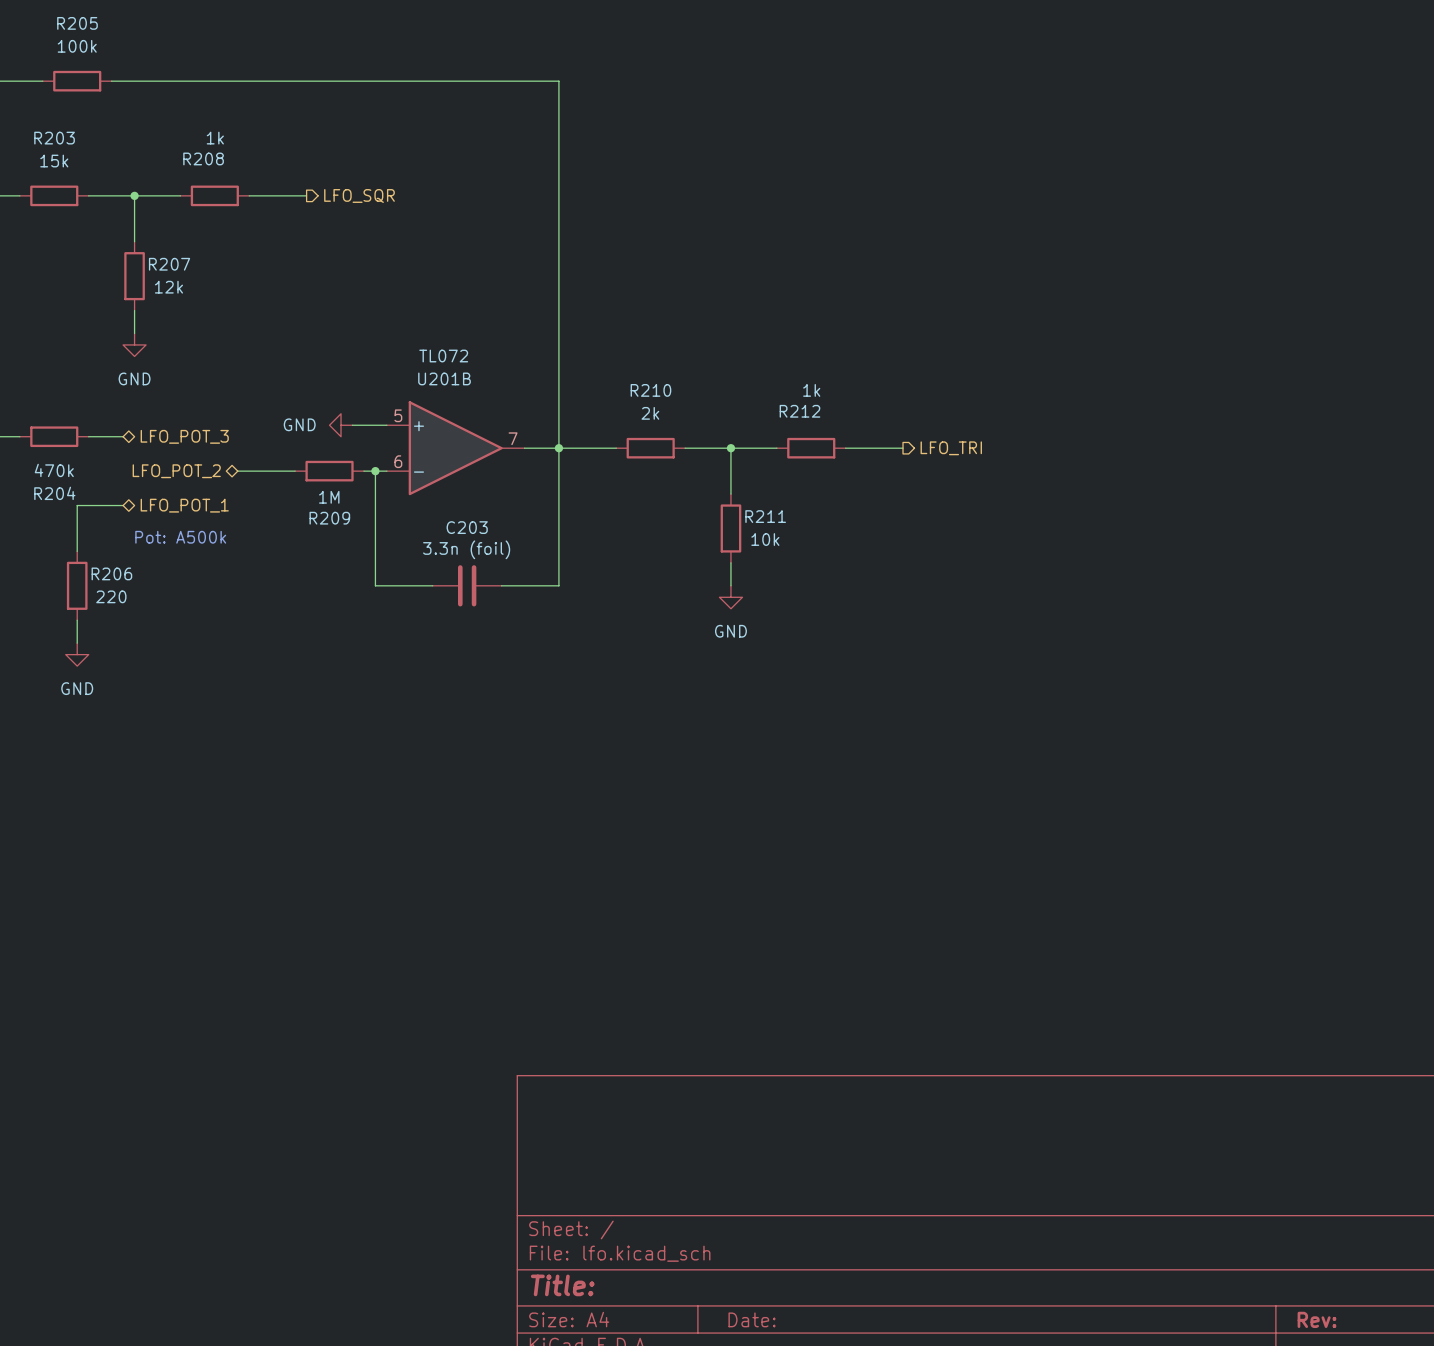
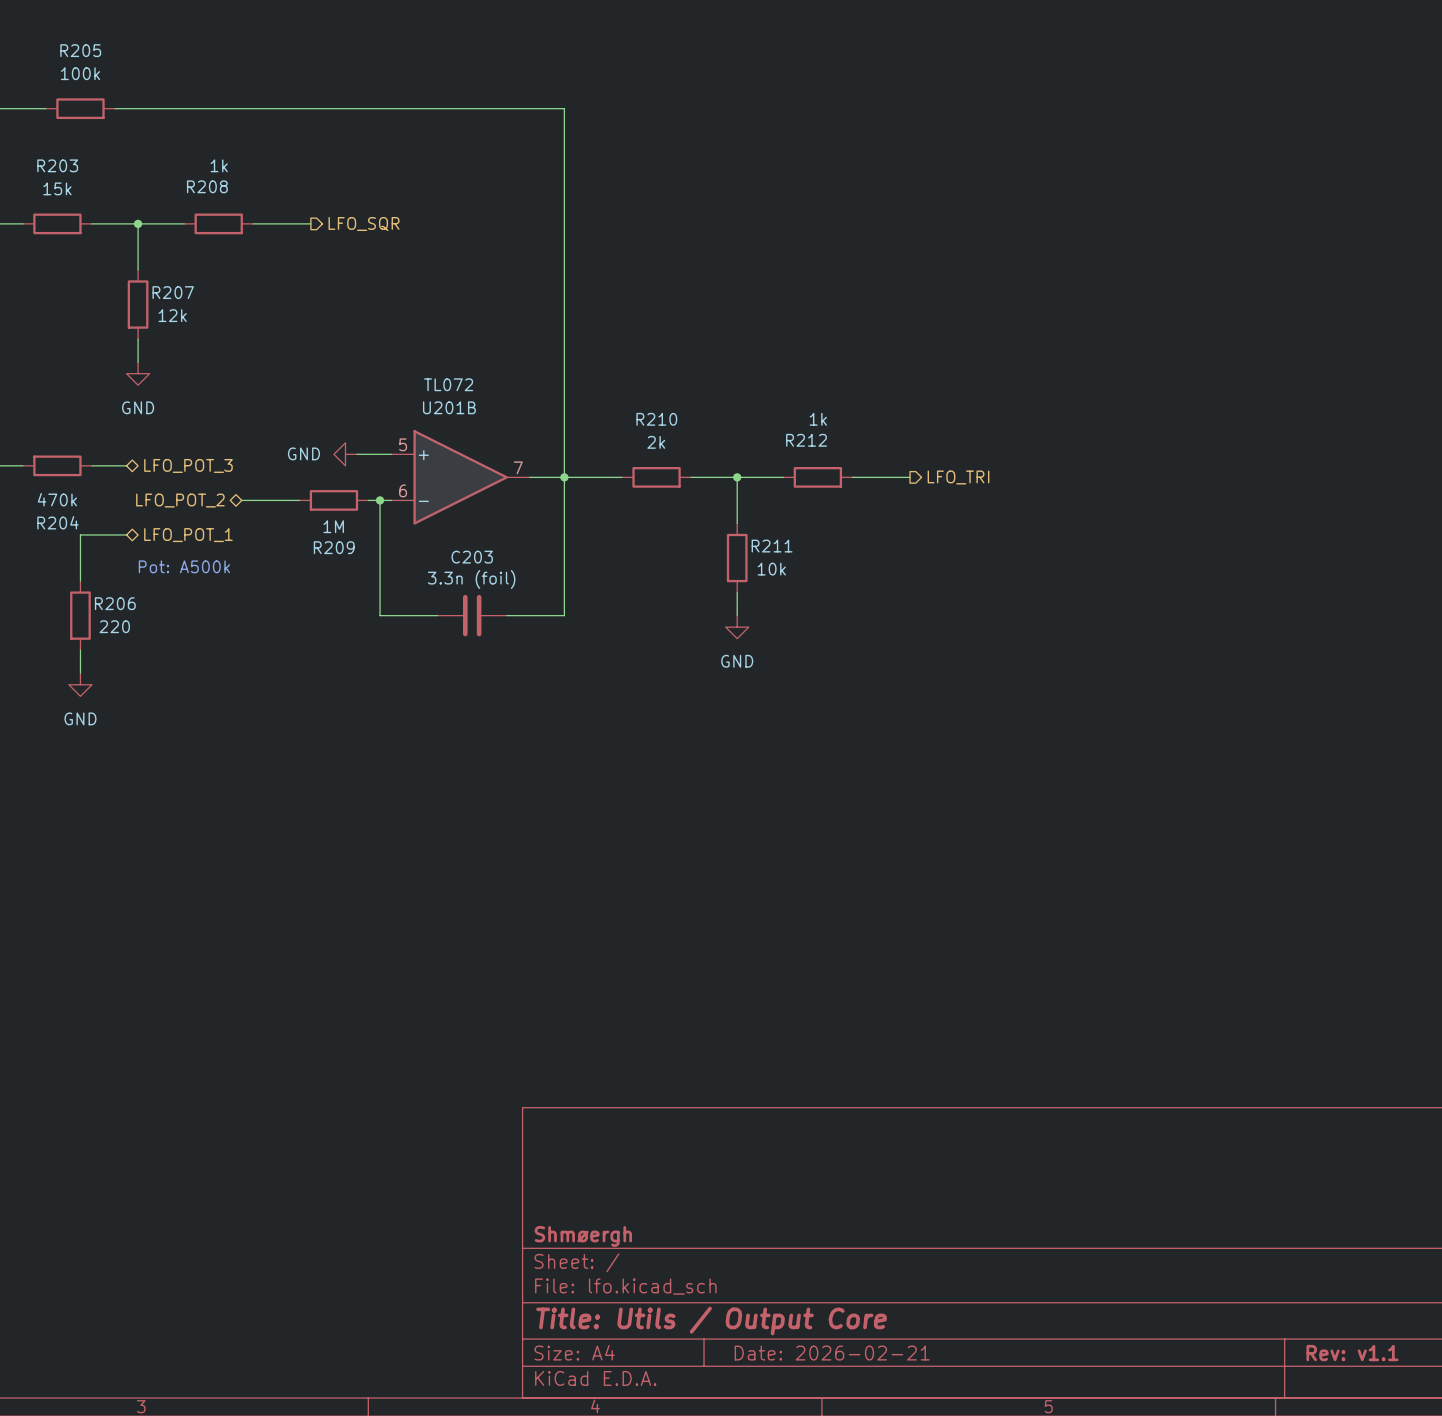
title block: none -> Shmøergh (583, 1236)
title block: Title: (562, 1285) -> Title: Utils / Output Core (711, 1321)
title block: Date: (752, 1319) -> Date: 2026-02-21 (832, 1353)
title block: Rev: (1317, 1319) -> Rev: v1.1 (1352, 1353)

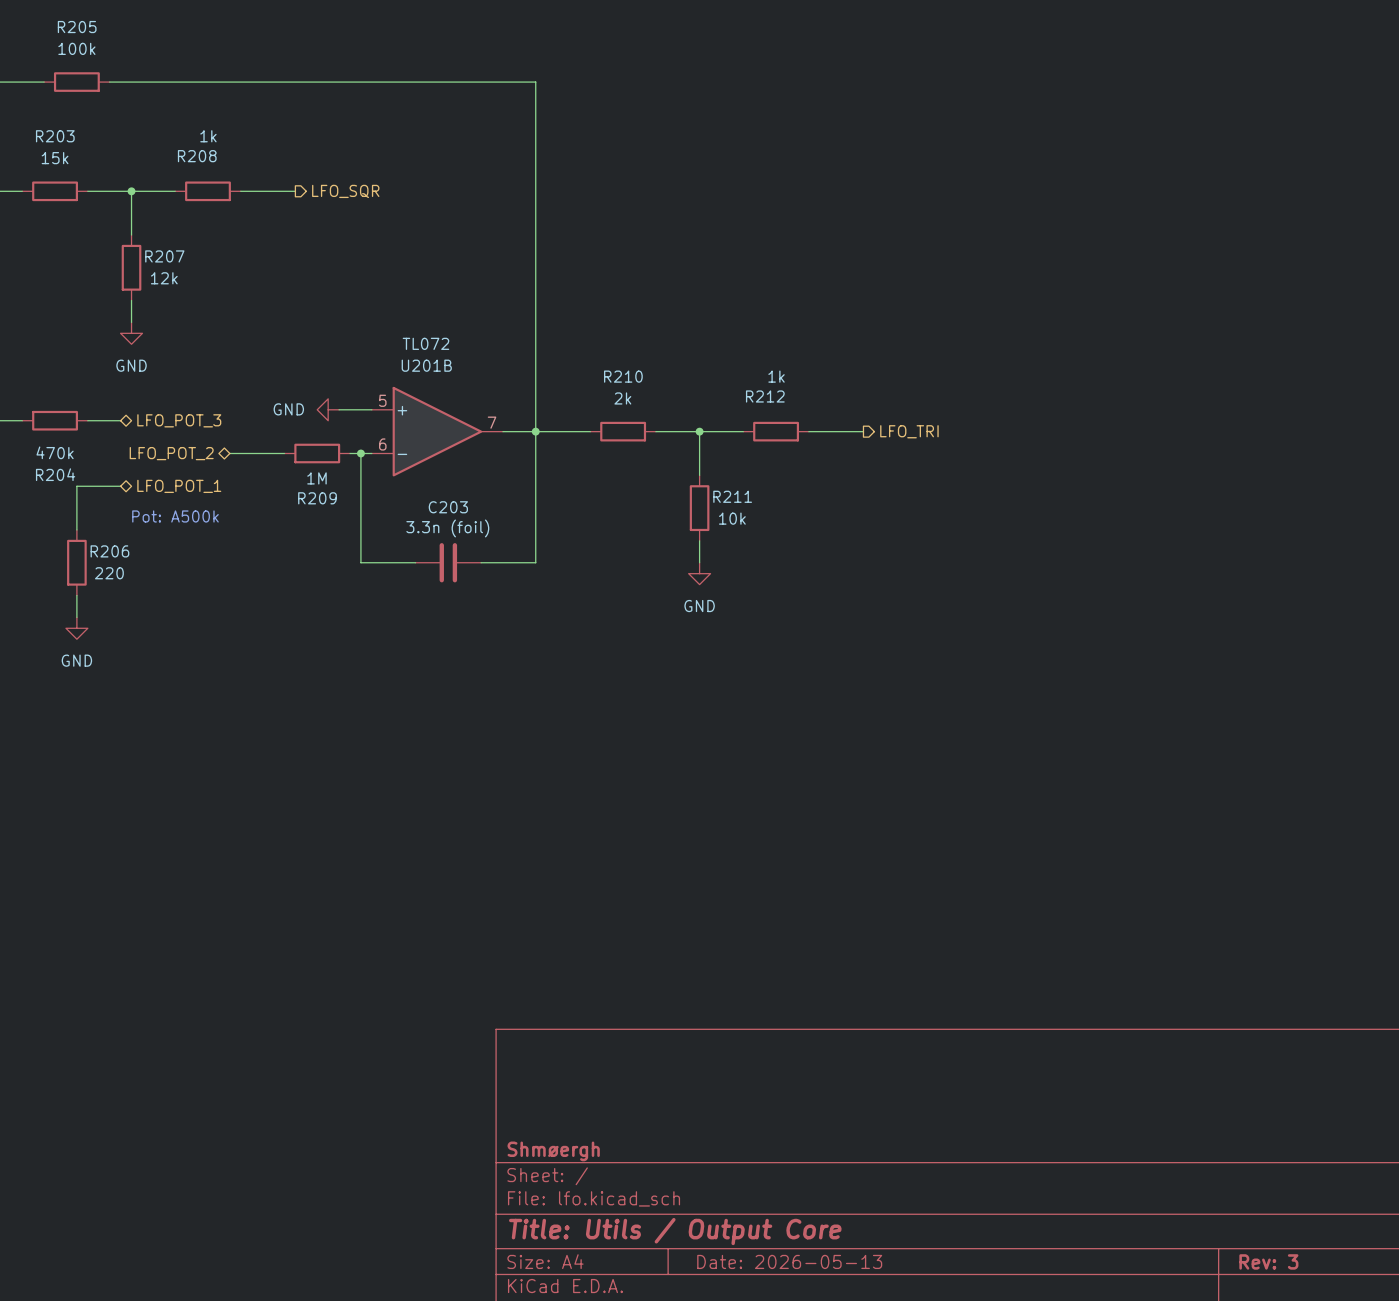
title block: Date: 2026-02-21 (832, 1353) -> Date: 2026-05-13 (789, 1261)
title block: Rev: v1.1 (1352, 1353) -> Rev: 3 (1268, 1261)

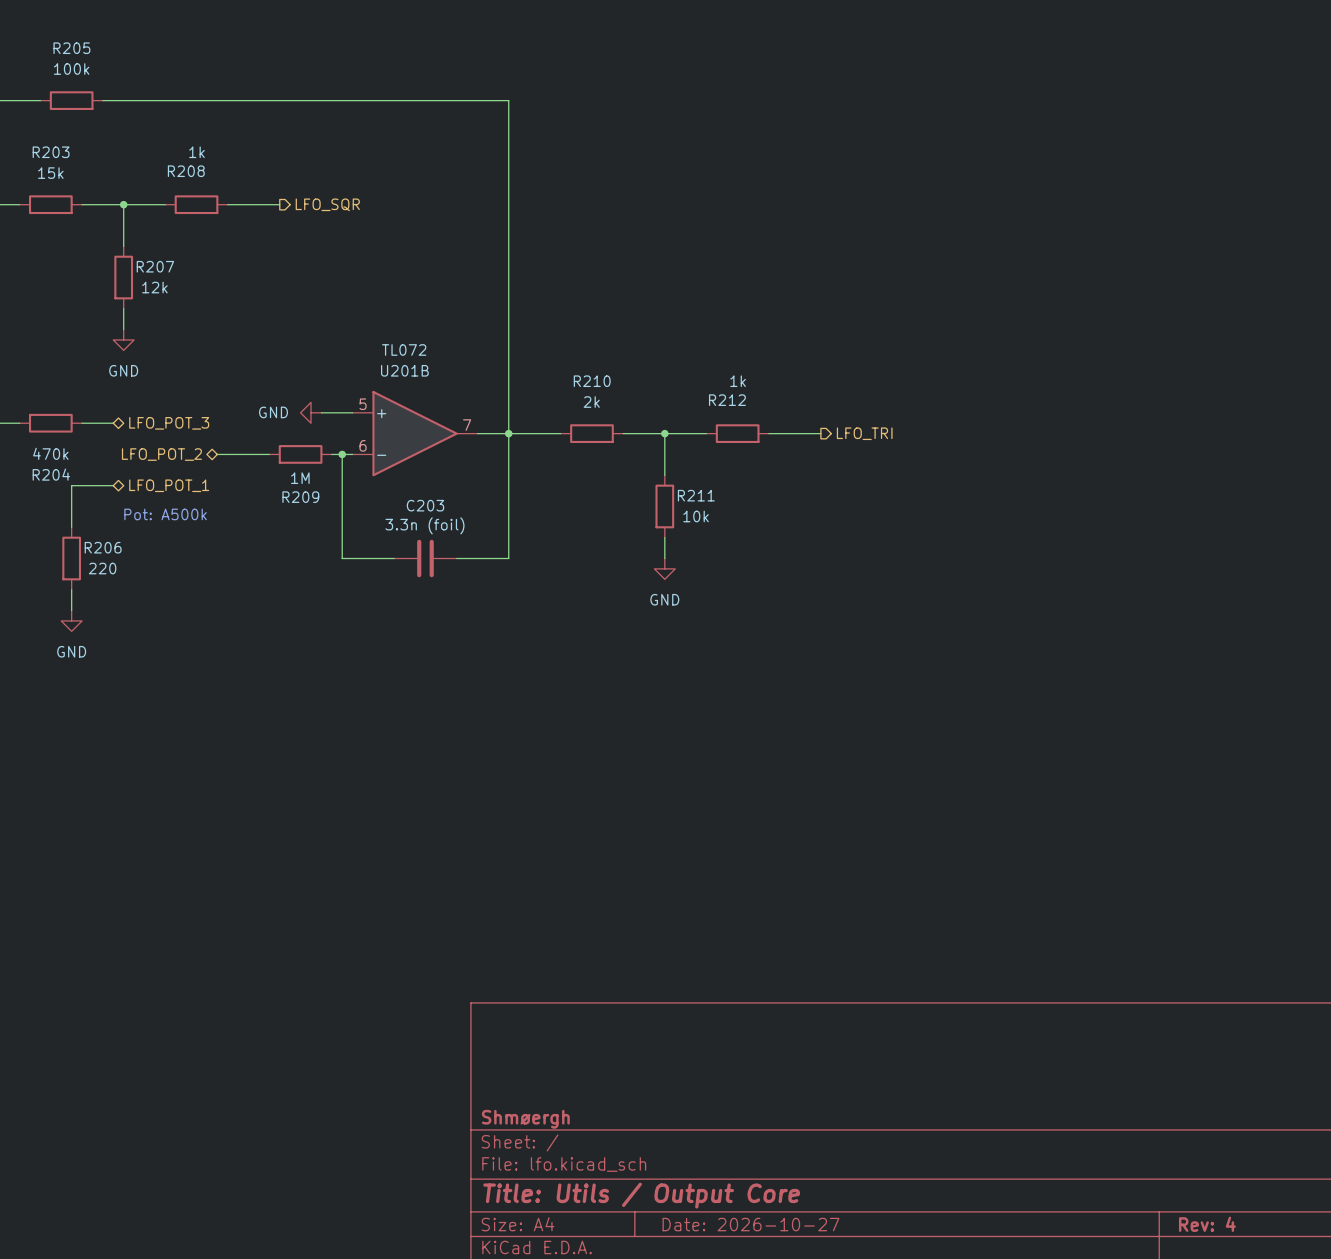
title block: Date: 2026-05-13 (789, 1261) -> Date: 2026-10-27 (750, 1224)
title block: Rev: 3 (1268, 1261) -> Rev: 4 (1207, 1224)

